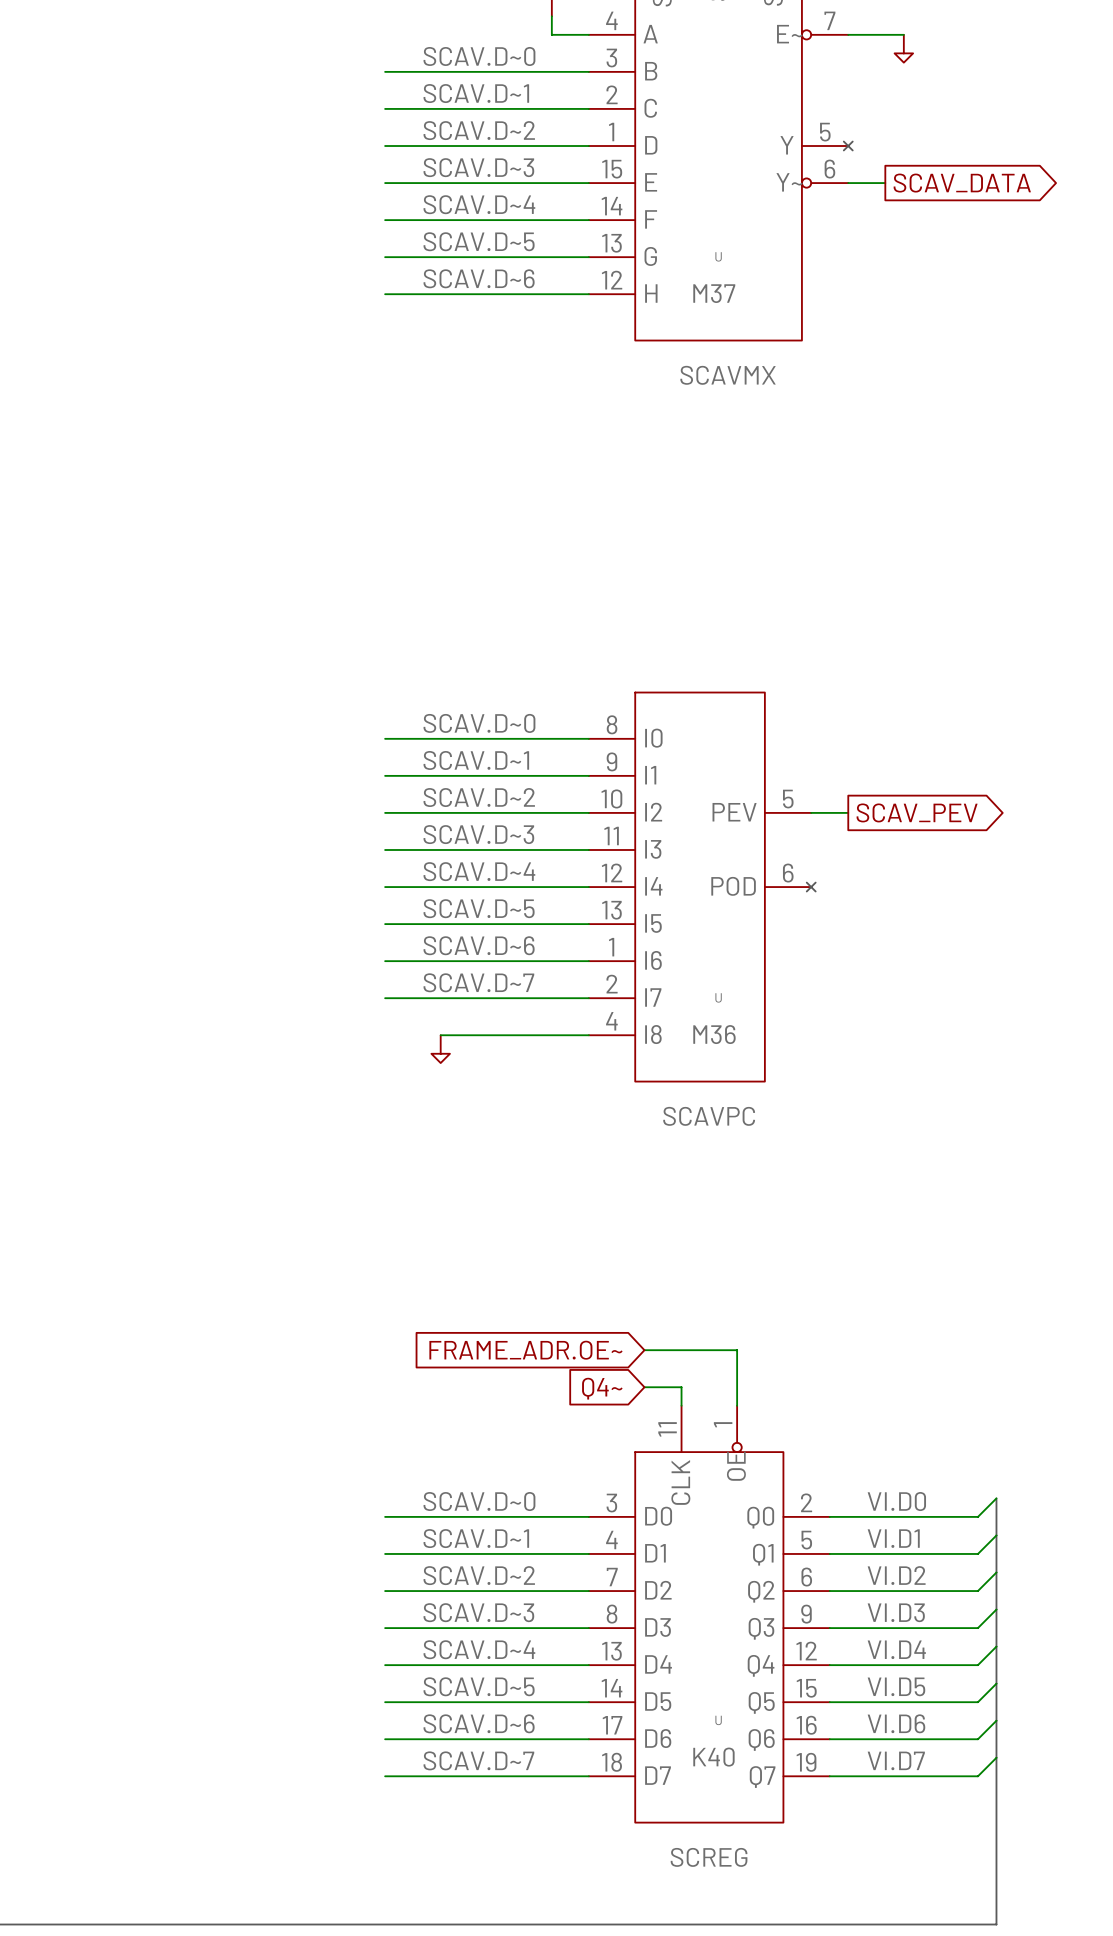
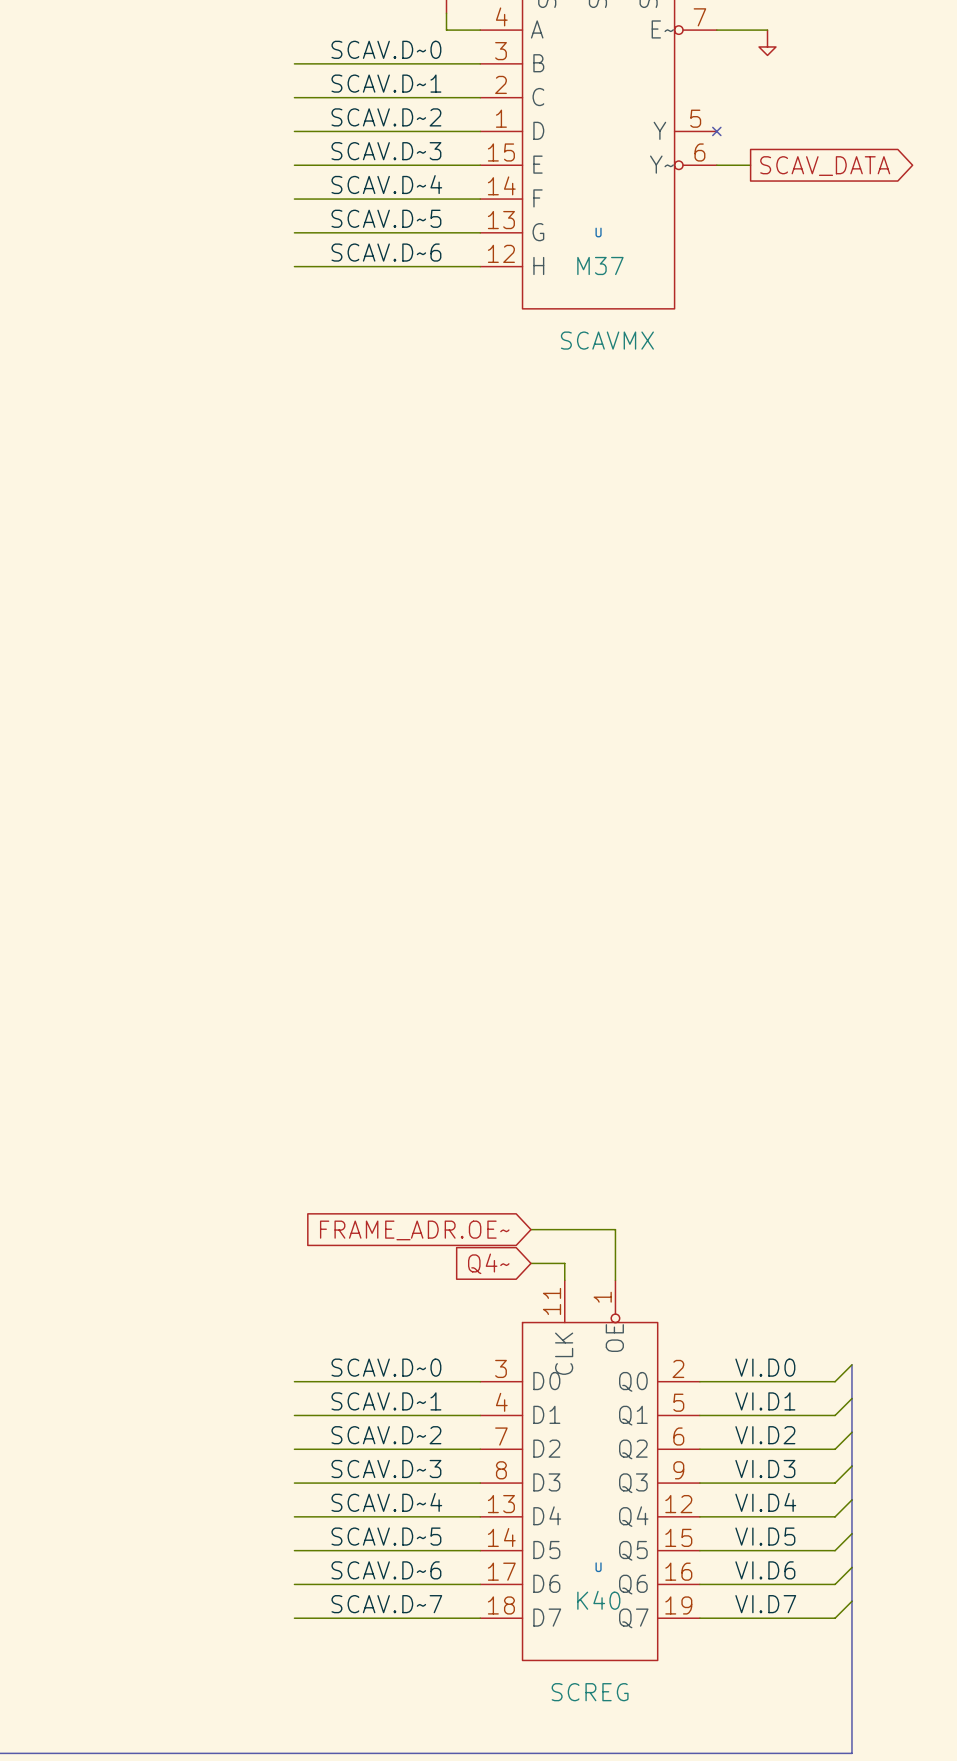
label: SCAV.D~0 (479, 723) -> none
wire: (385, 738) (588, 738) -> none
label: SCAV.D~1 (476, 760) -> none
wire: (385, 775) (588, 775) -> none
label: SCAV.D~2 (479, 797) -> none
wire: (385, 812) (588, 812) -> none
wire: (811, 812) (848, 812) -> none
global label: SCAV_PEV (917, 812) -> none
label: SCAV.D~3 (478, 834) -> none
wire: (385, 849) (588, 849) -> none
label: SCAV.D~4 (479, 871) -> none
wire: (385, 887) (588, 887) -> none
U: (700, 887) -> none
no-connect mark: (811, 887) -> none
label: SCAV.D~5 (479, 908) -> none
wire: (385, 924) (588, 924) -> none
label: SCAV.D~6 (479, 945) -> none
wire: (385, 961) (588, 961) -> none
label: SCAV.D~7 (478, 982) -> none
wire: (385, 998) (588, 998) -> none
wire: (440, 1035) (588, 1035) -> none
power symbol: (440, 1049) -> none

